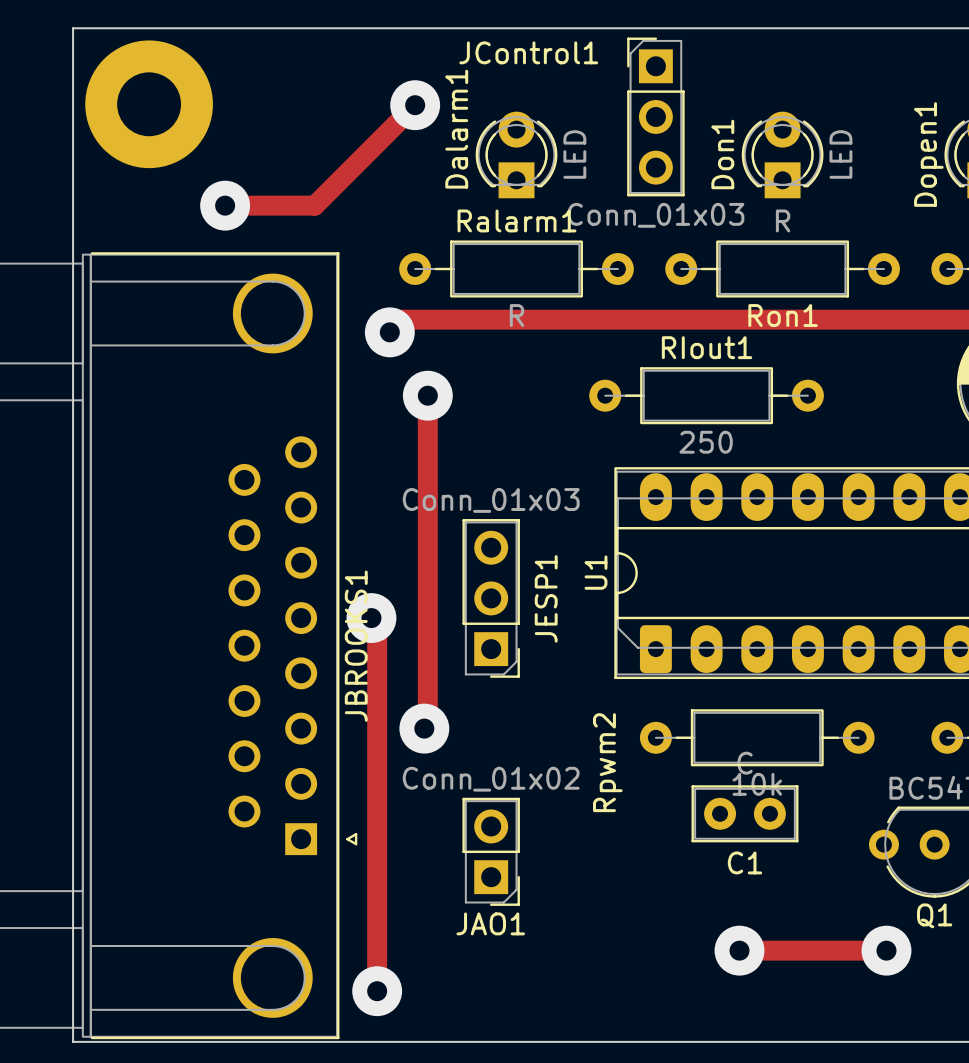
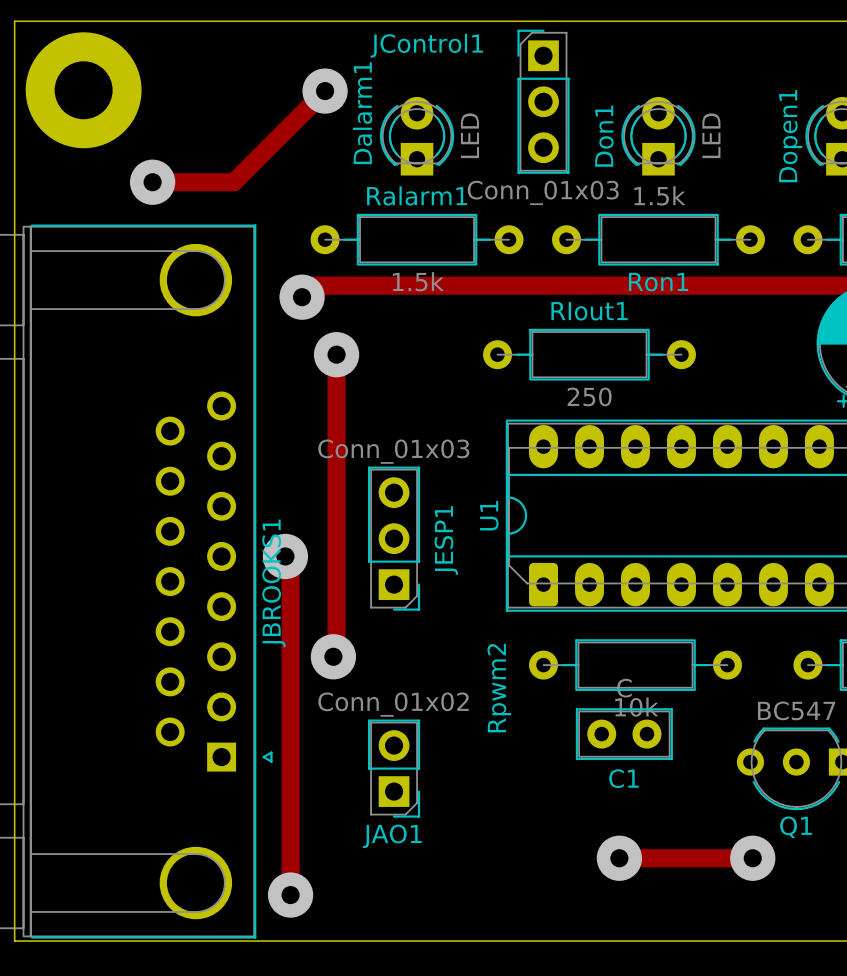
Ron1 value: R (783, 220) -> 1.5k (659, 195)
Ralarm1 value: R (517, 315) -> 1.5k (418, 281)

